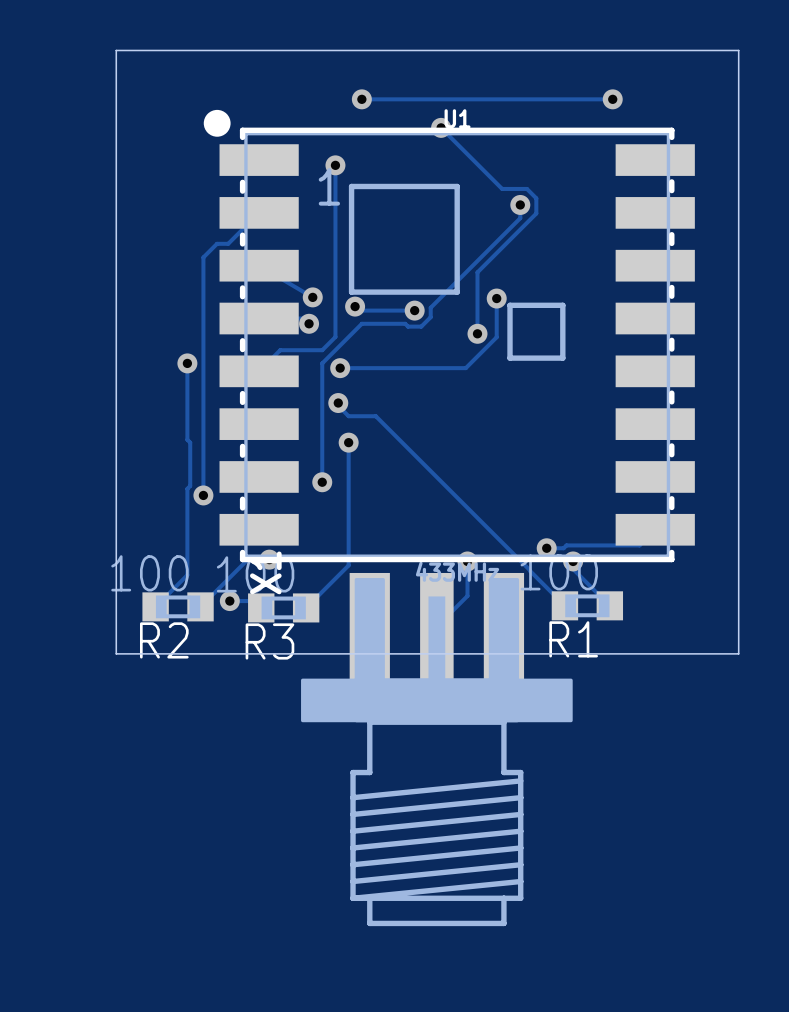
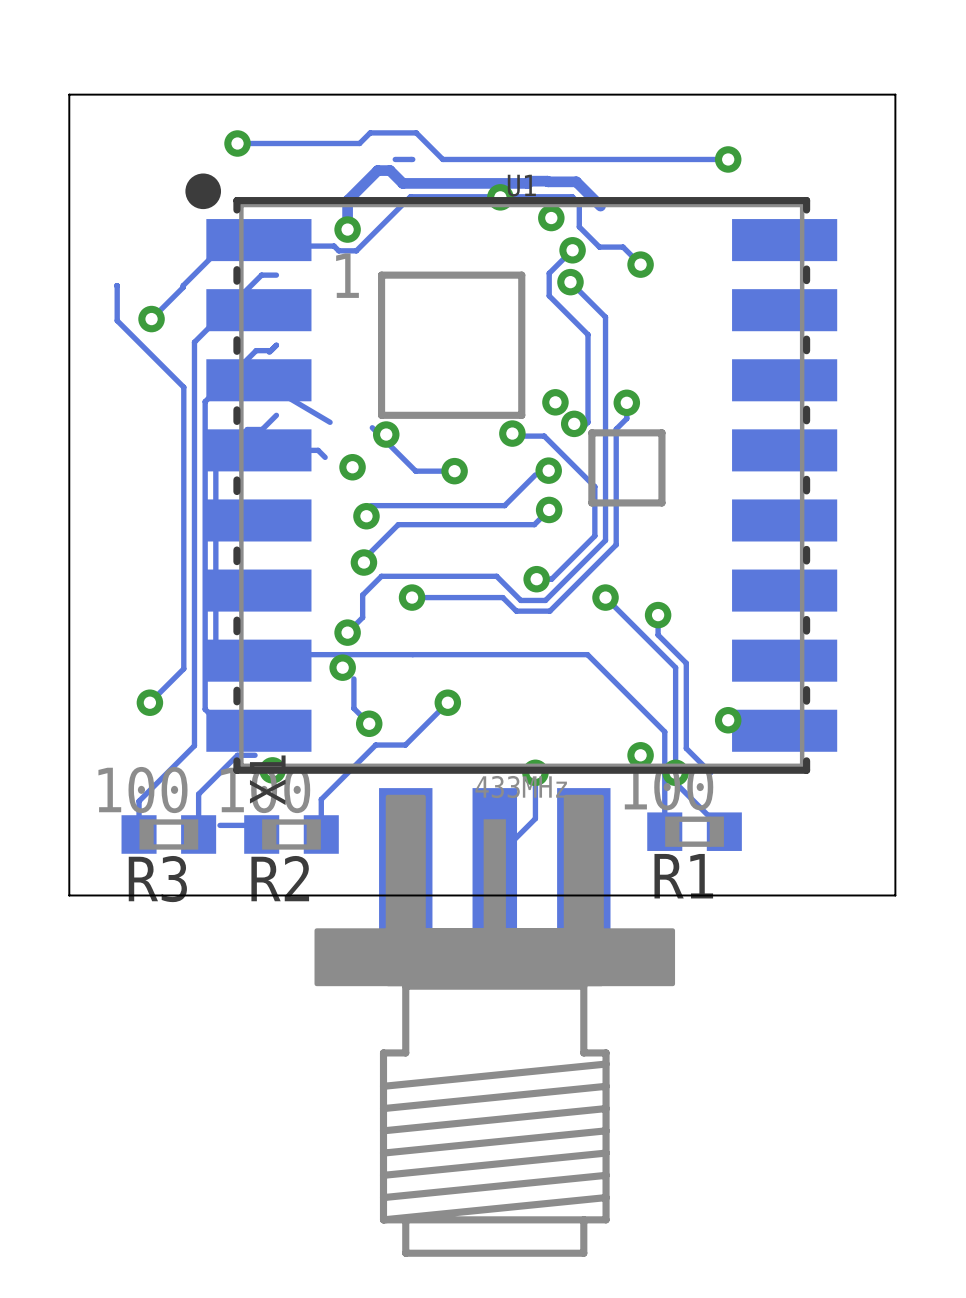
via: none -> (237, 143)
via: (361, 99) -> none
track: (397, 99) (375, 99) -> (442, 159) (416, 132) (370, 132) (359, 143) (237, 143)
track: (441, 127) (502, 188) (526, 188) (536, 198) (536, 213) (477, 272) (477, 333) -> none
track: none -> (600, 206) (576, 181) (402, 183) (390, 170) (377, 170) (347, 200) (347, 229)
via: none -> (551, 218)
track: (335, 165) (335, 337) (322, 350) (280, 350) (259, 371) -> none
via position: (335, 165) -> (347, 229)
track: none -> (572, 250) (549, 273) (549, 295) (588, 334) (588, 422) (581, 428)
via: none -> (572, 250)
track: none -> (640, 264) (623, 247) (599, 247) (579, 226) (579, 203) (572, 196) (410, 196) (356, 250) (338, 250) (334, 246) (220, 246) (151, 319)
via: none -> (640, 264)
track: none -> (276, 275) (261, 275) (194, 342) (194, 745) (139, 801) (139, 834) (132, 827)
track: none -> (570, 282) (605, 317) (605, 540) (545, 600) (520, 600) (496, 576) (381, 576) (362, 595) (362, 617) (347, 632)
via: none -> (570, 282)
track: none -> (117, 285) (117, 320) (183, 387) (183, 668) (149, 702)
track: (520, 204) (520, 218) (430, 307) (430, 317) (421, 326) (408, 326) (405, 323) (361, 323) (322, 363) (322, 482) -> none
via: (520, 204) -> none
track: (259, 212) (228, 243) (217, 243) (203, 257) (203, 495) -> none
via: none -> (151, 319)
track: none -> (276, 345) (269, 352)
track: none -> (270, 350) (256, 350) (205, 401) (205, 709) (220, 724)
via: none -> (555, 402)
track: none -> (626, 402) (626, 418) (616, 429) (616, 544) (549, 611) (516, 611) (502, 597) (412, 597)
via: none -> (626, 402)
via: (312, 297) -> none
track: (496, 298) (496, 337) (465, 368) (340, 368) -> none
track: none -> (372, 427) (415, 471) (454, 471)
track: none -> (512, 433) (514, 436) (544, 436) (594, 486) (594, 535) (551, 579) (536, 579)
via: none -> (512, 433)
track: (355, 306) (361, 310) (414, 310) -> none
via: (414, 310) -> none
via: (309, 323) -> none
via: none -> (352, 467)
via: none -> (454, 471)
track: none -> (535, 474) (504, 505) (371, 505)
track: (187, 363) (187, 439) (190, 442) (190, 485) (187, 488) (187, 575) (155, 606) -> none
via: (187, 363) -> none
track: none -> (549, 509) (534, 524) (398, 524) (360, 562)
via: none -> (549, 509)
track: (338, 403) (338, 405) (348, 416) (375, 416) (530, 570) -> none
via: none -> (536, 579)
via: none -> (412, 597)
track: none -> (605, 597) (675, 667) (675, 772)
via: none -> (605, 597)
track: (348, 442) (348, 565) (306, 607) -> (447, 702) (405, 745) (375, 745) (321, 799) (321, 833)
via: (348, 442) -> none
track: none -> (658, 615) (658, 635) (686, 663) (686, 748) (710, 772)
via: none -> (658, 615)
via: none -> (347, 632)
track: none -> (353, 678) (353, 708) (369, 723)
via position: (203, 495) -> (149, 702)
via: none -> (447, 702)
via: none -> (728, 720)
via: none -> (369, 723)
track: (655, 529) (639, 545) (566, 545) (563, 548) (546, 548) -> none
track: none -> (255, 755) (237, 755) (198, 794) (198, 834)
track: (269, 559) (247, 559) (200, 606) -> none
track: (530, 570) (564, 605) -> (276, 415) (262, 429) (247, 429) (215, 461) (215, 649) (220, 654) (587, 654) (664, 731) (664, 831)
via: (229, 601) -> none
R2 position: (178, 606) -> (168, 834)
R2 name: R2 (164, 640) -> R3 (157, 879)
R3 name: R3 (269, 641) -> R2 (280, 878)

